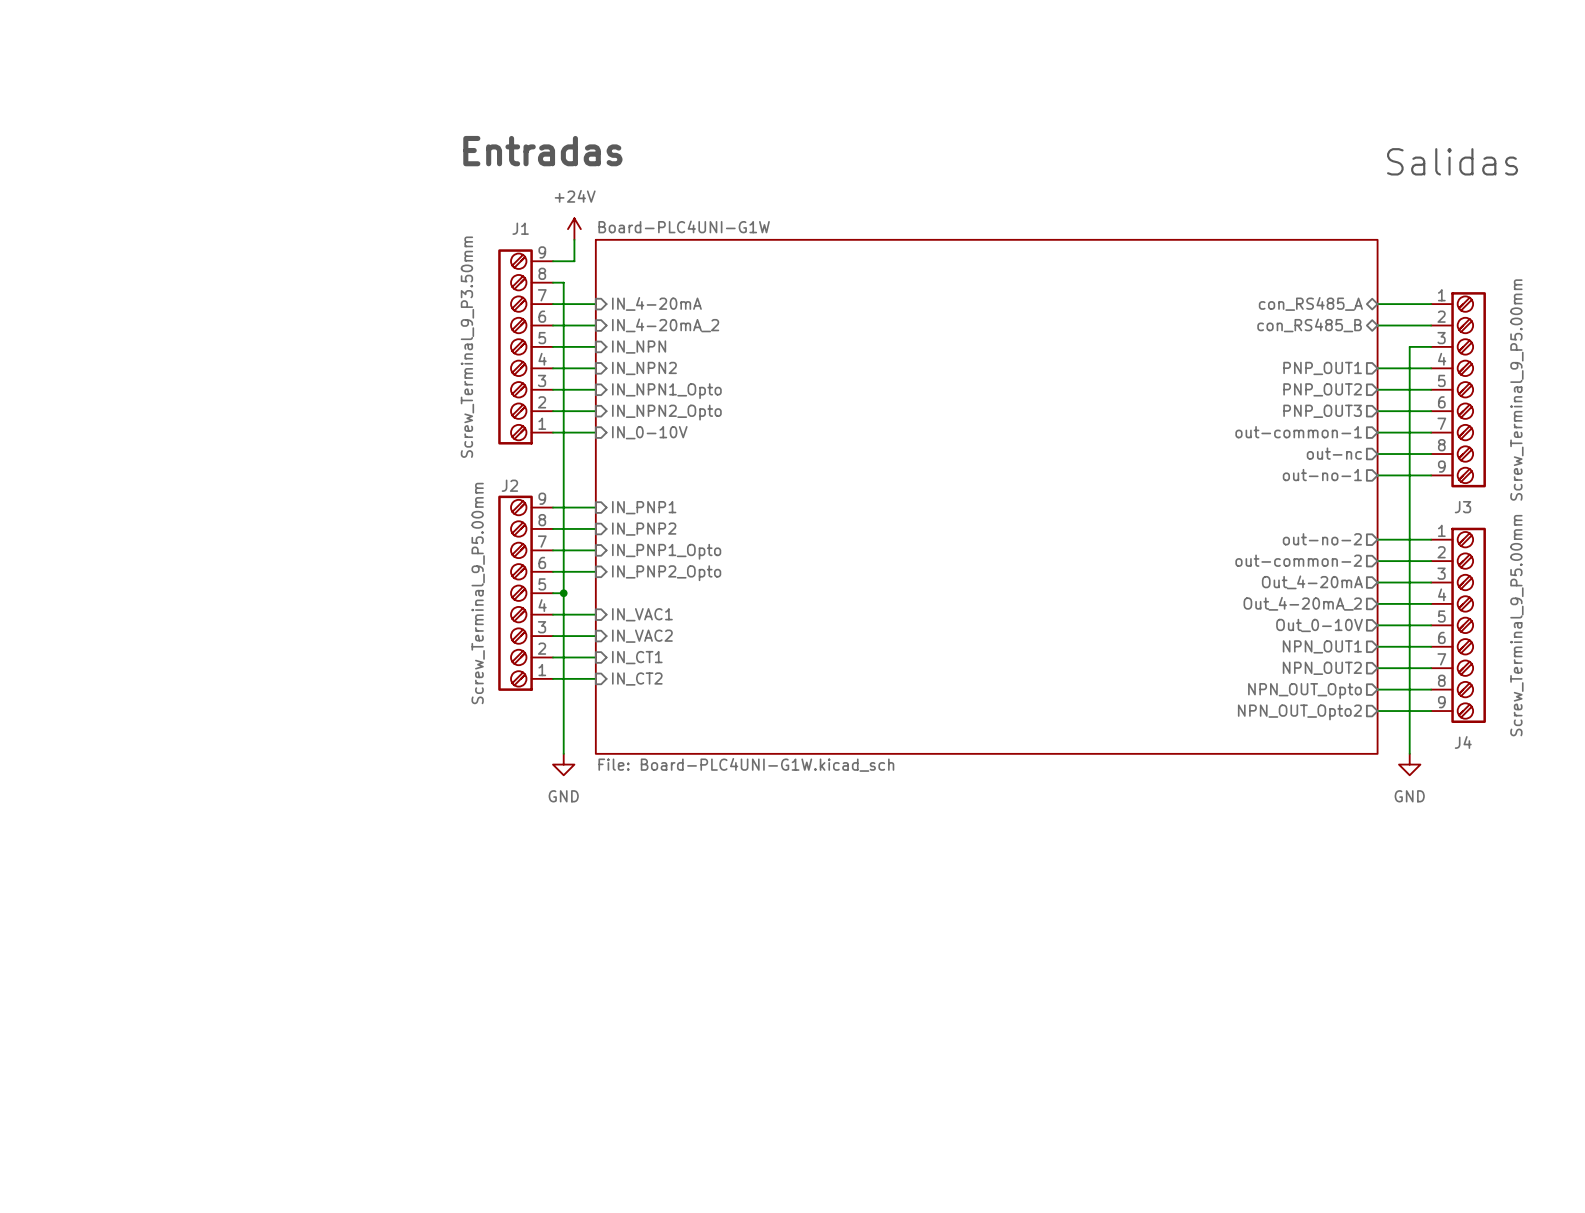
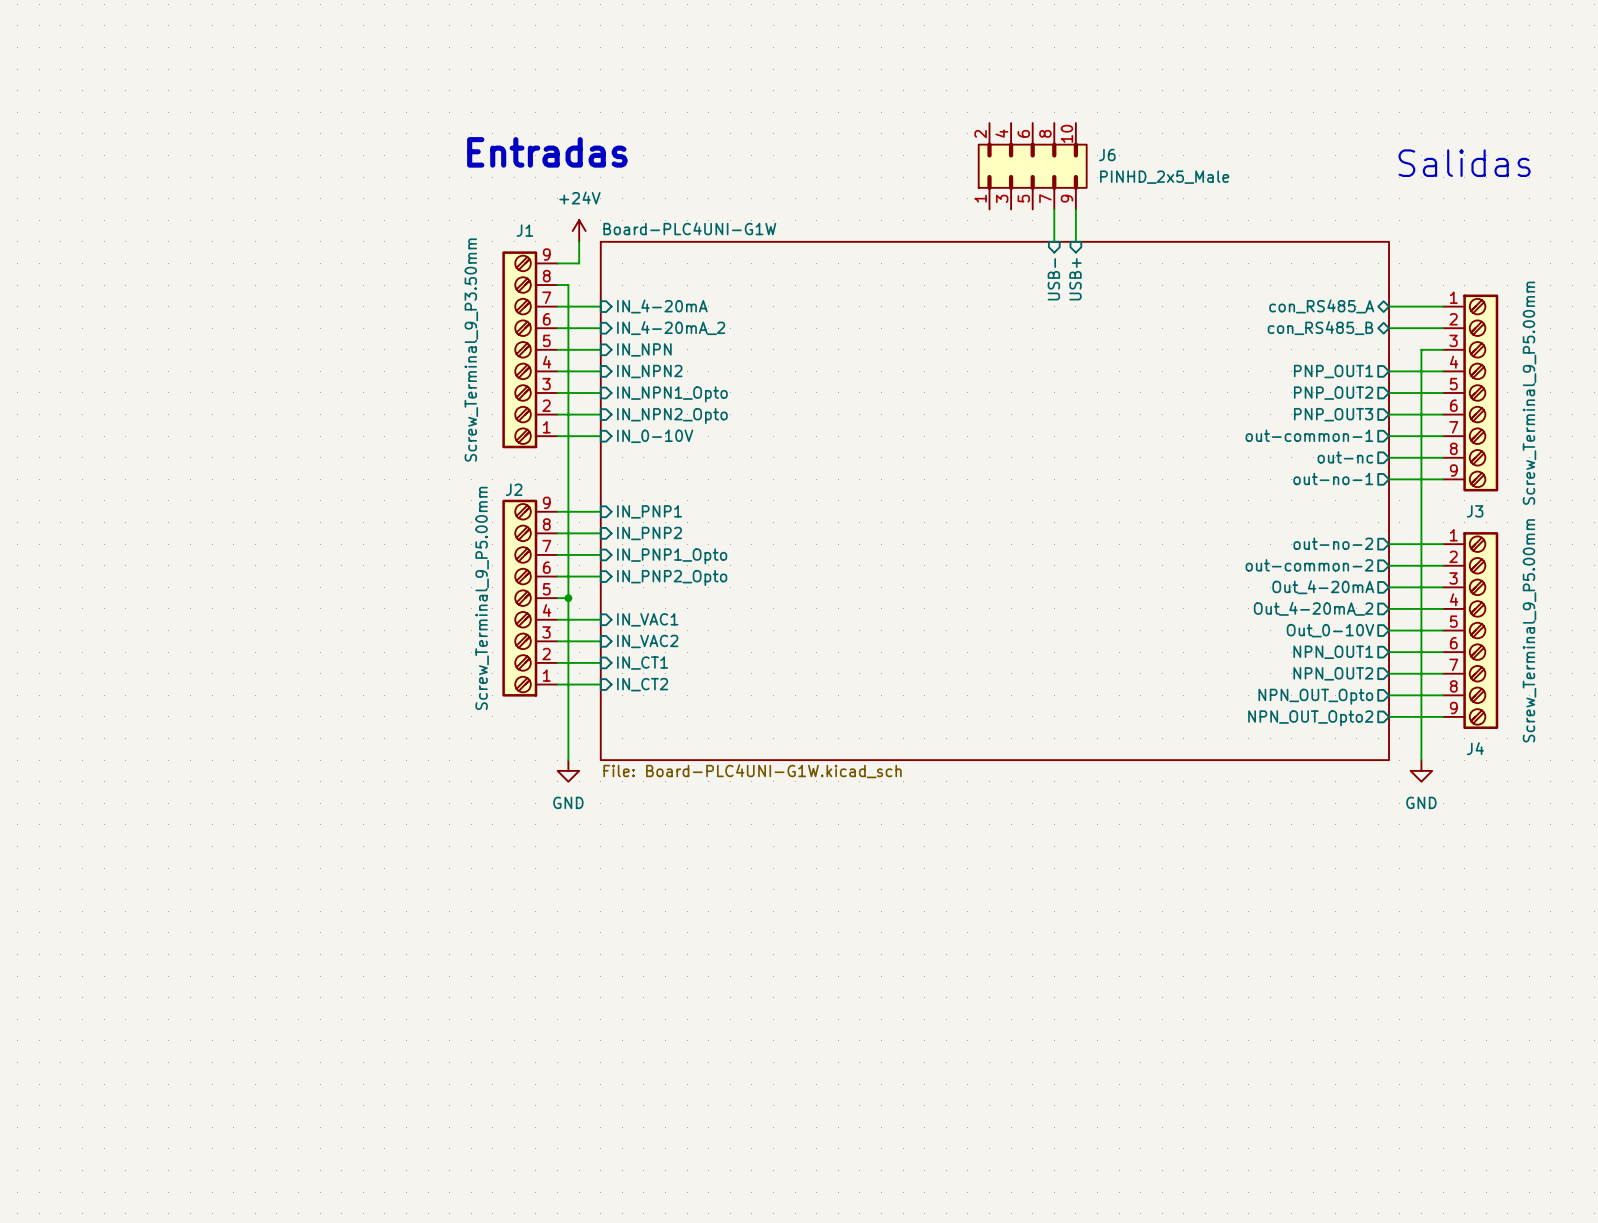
J6: none -> PINHD_2x5_Male (1032, 166)
wire: none -> (1054, 209) (1054, 241)
wire: none -> (1075, 209) (1075, 241)
sheet pin: none -> USB- (1053, 279)
sheet pin: none -> USB+ (1075, 279)

